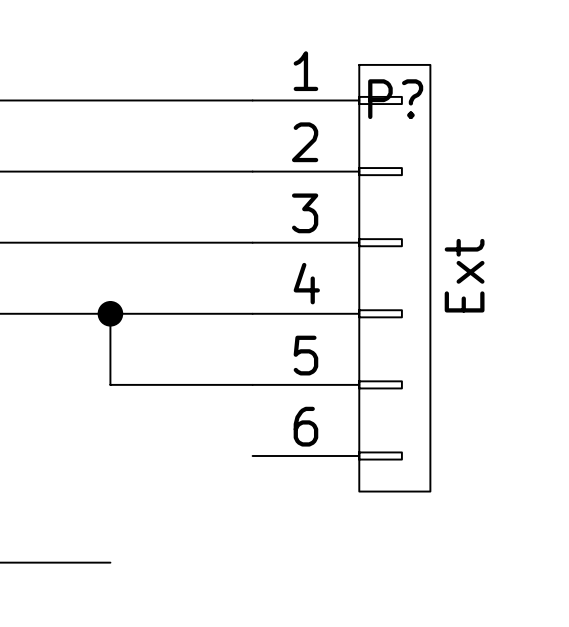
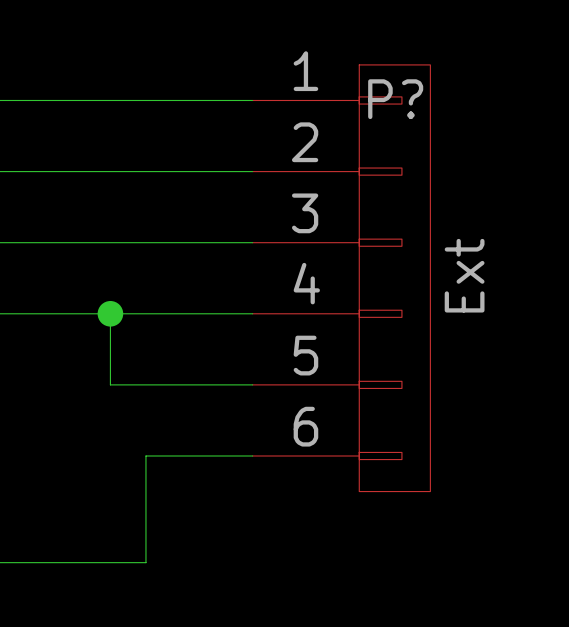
wire: none -> (252, 455) (145, 455) (145, 562) (110, 562)

